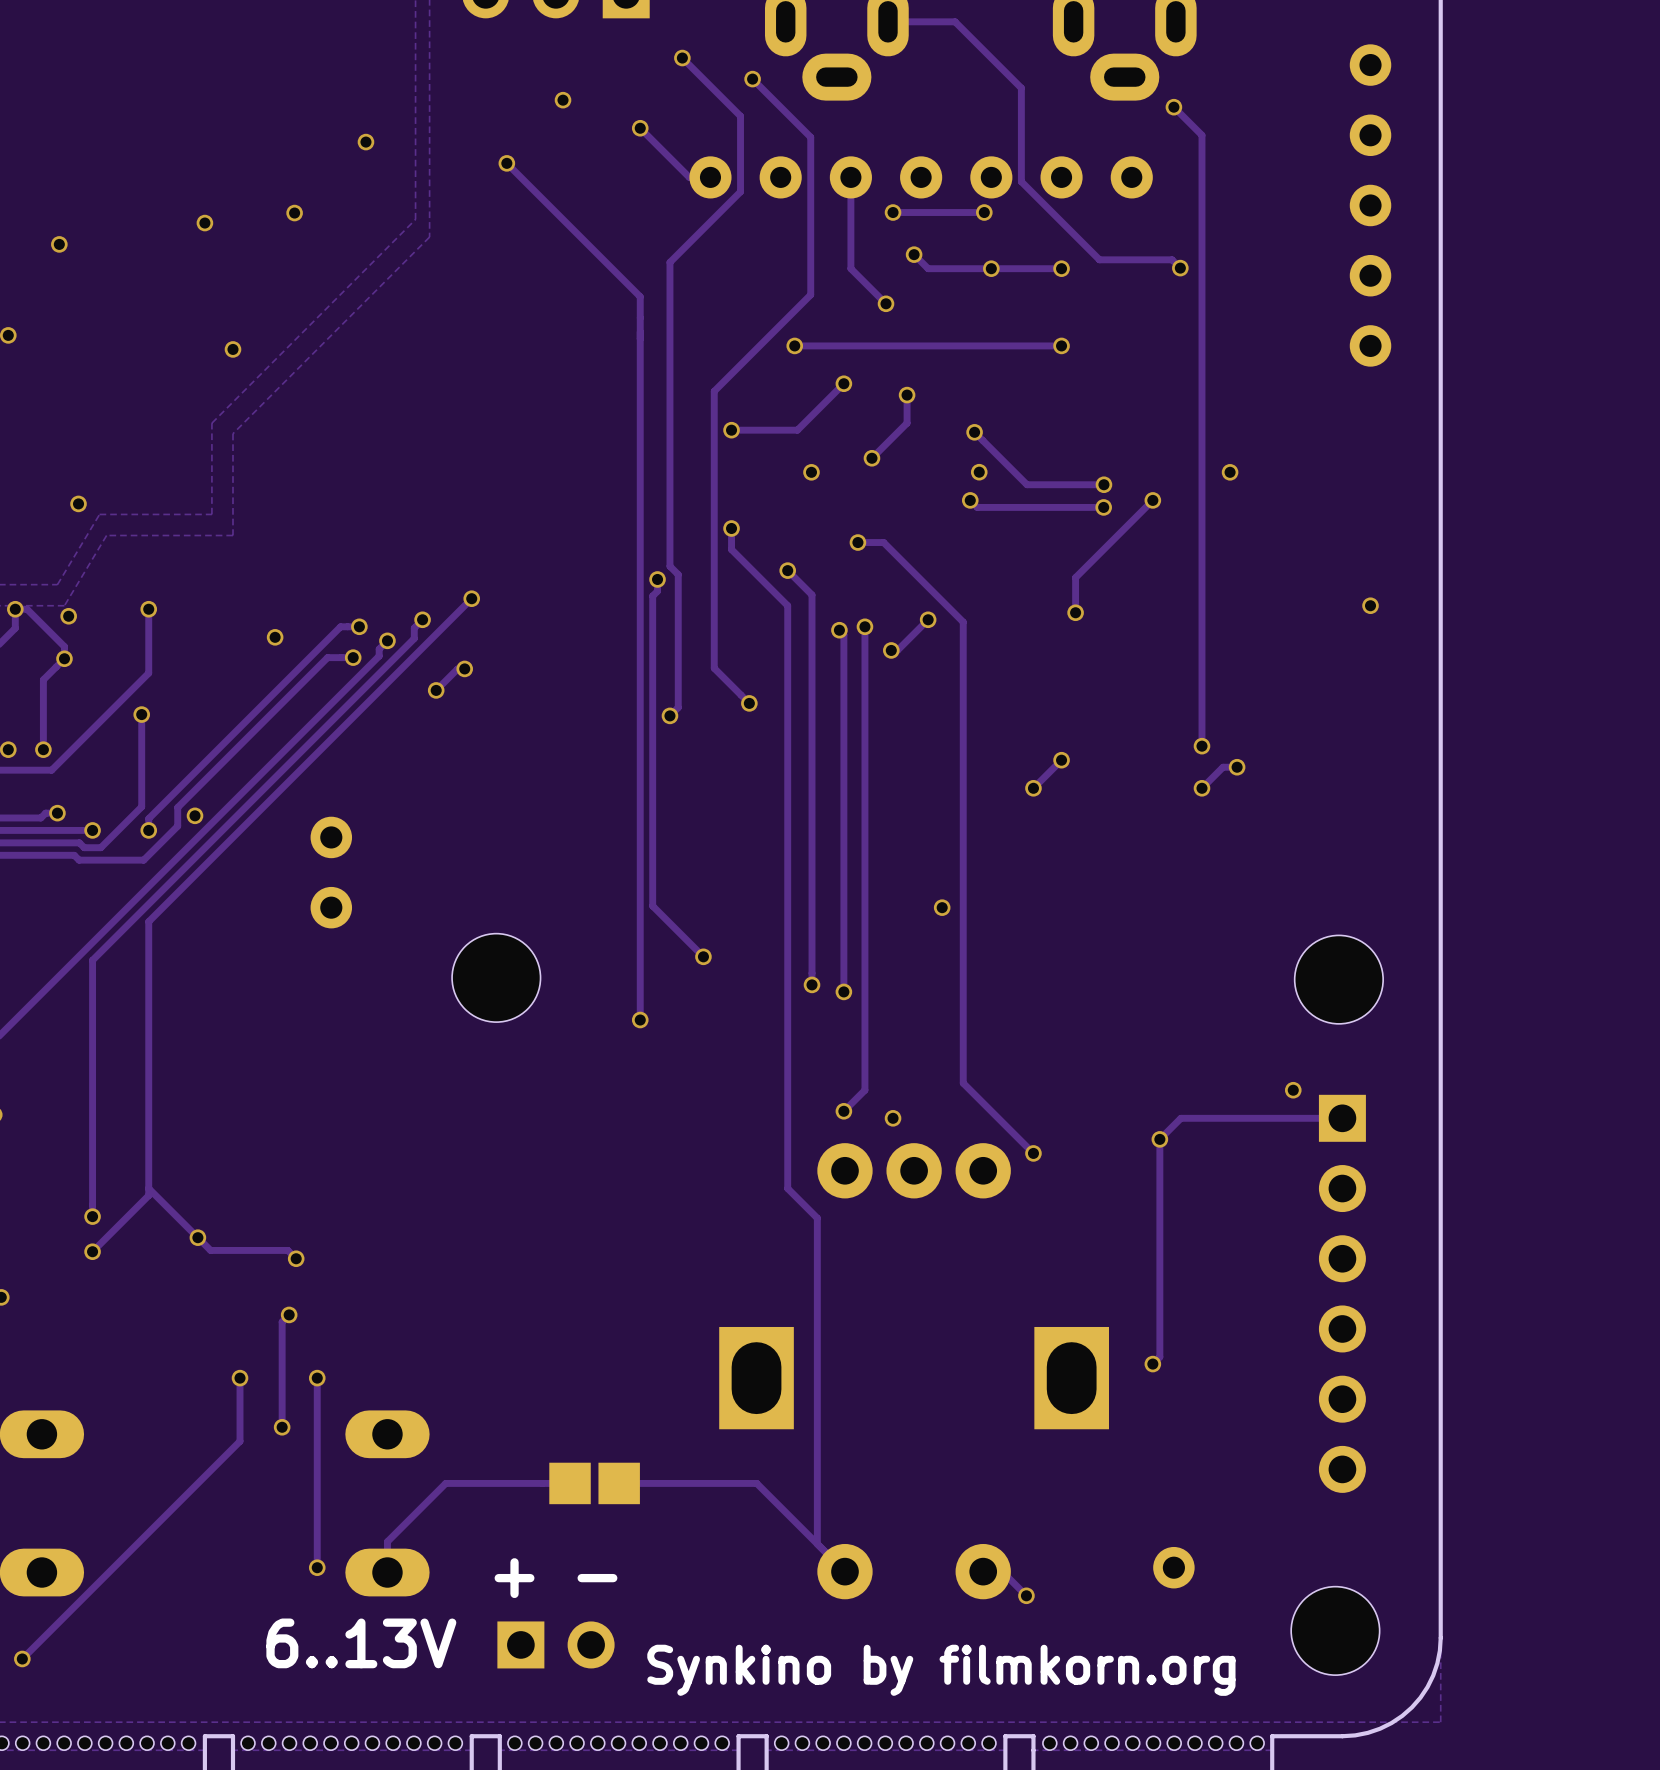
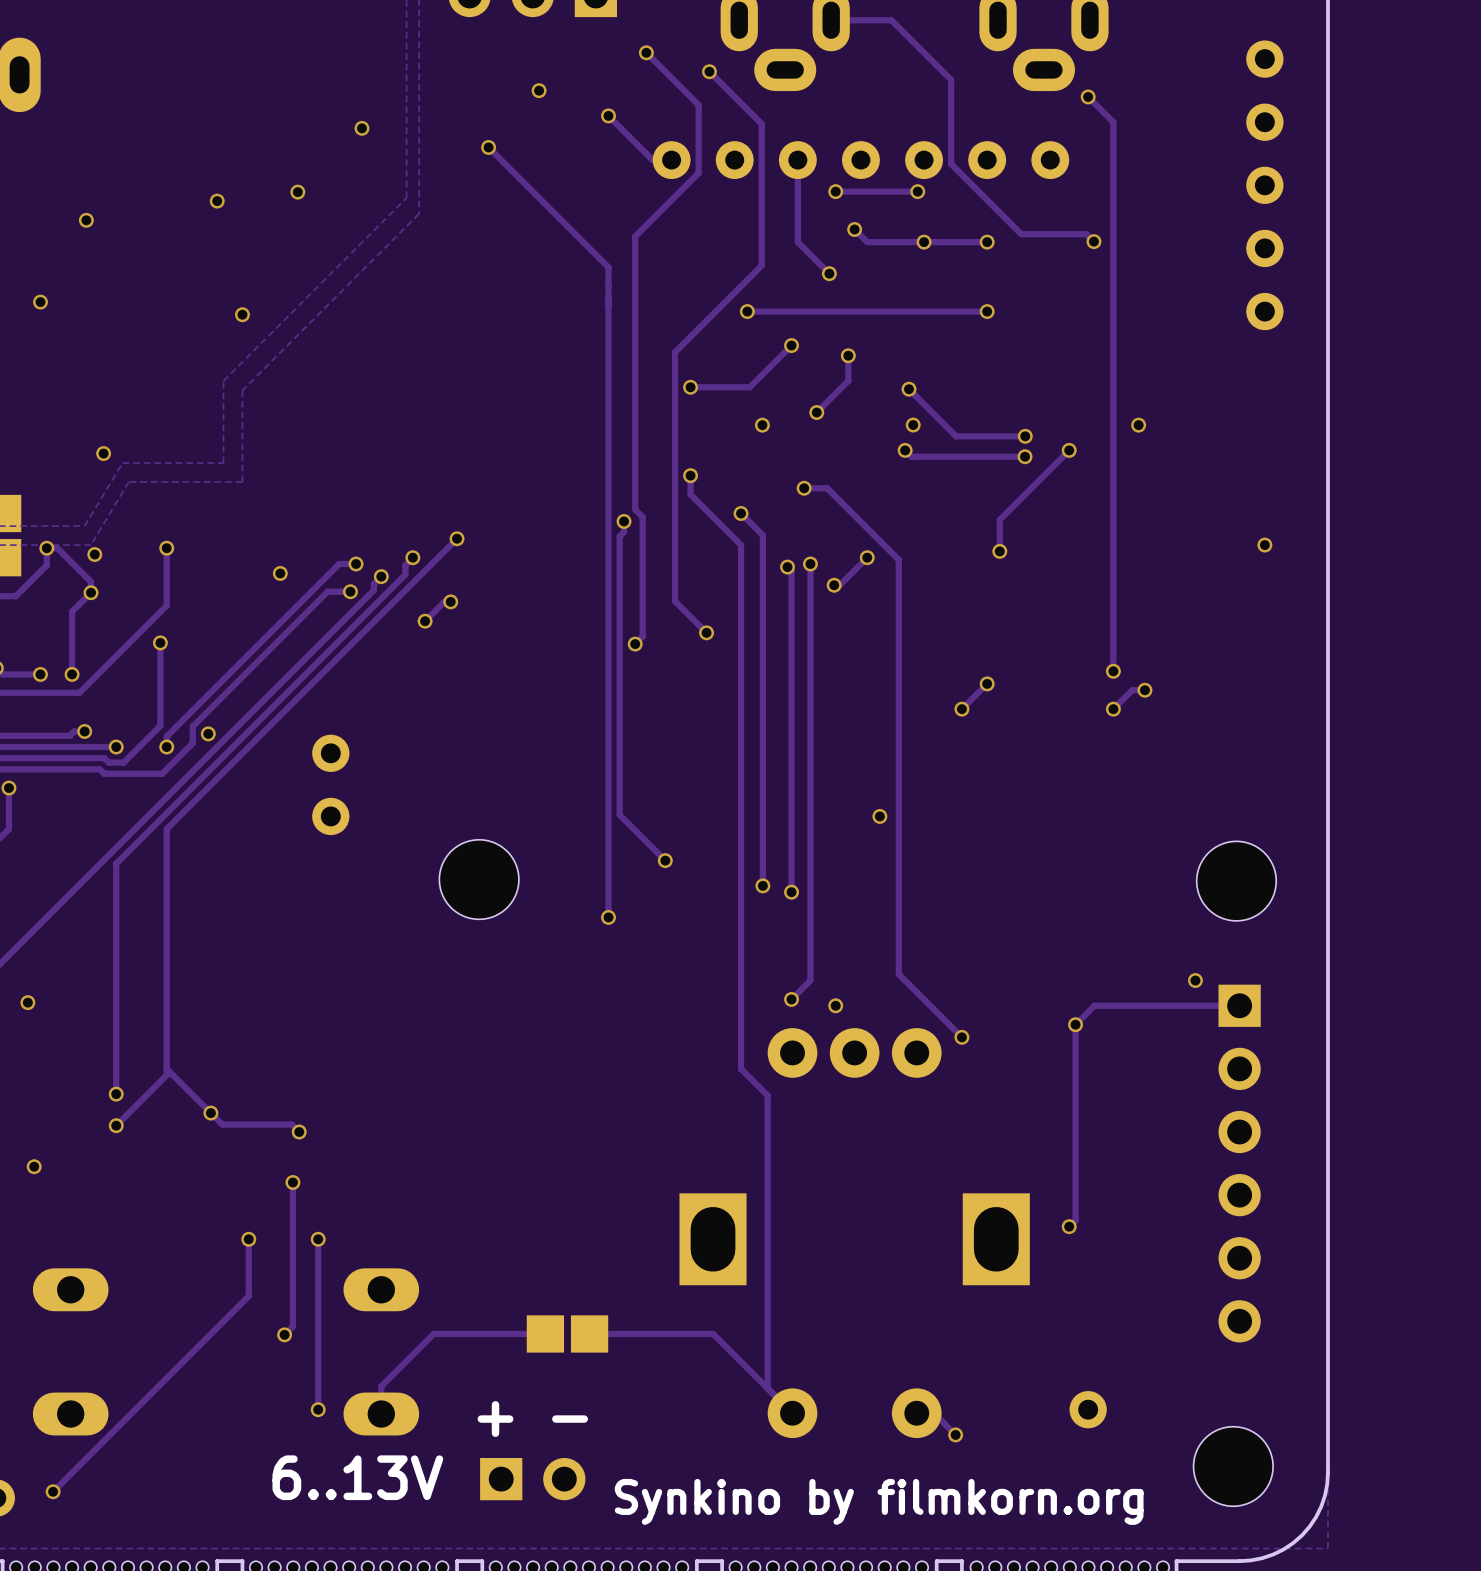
track: (289, 1314) (282, 1321) (282, 1427) -> (292, 1182) (292, 1326) (284, 1334)
via position: (282, 1427) -> (284, 1334)

